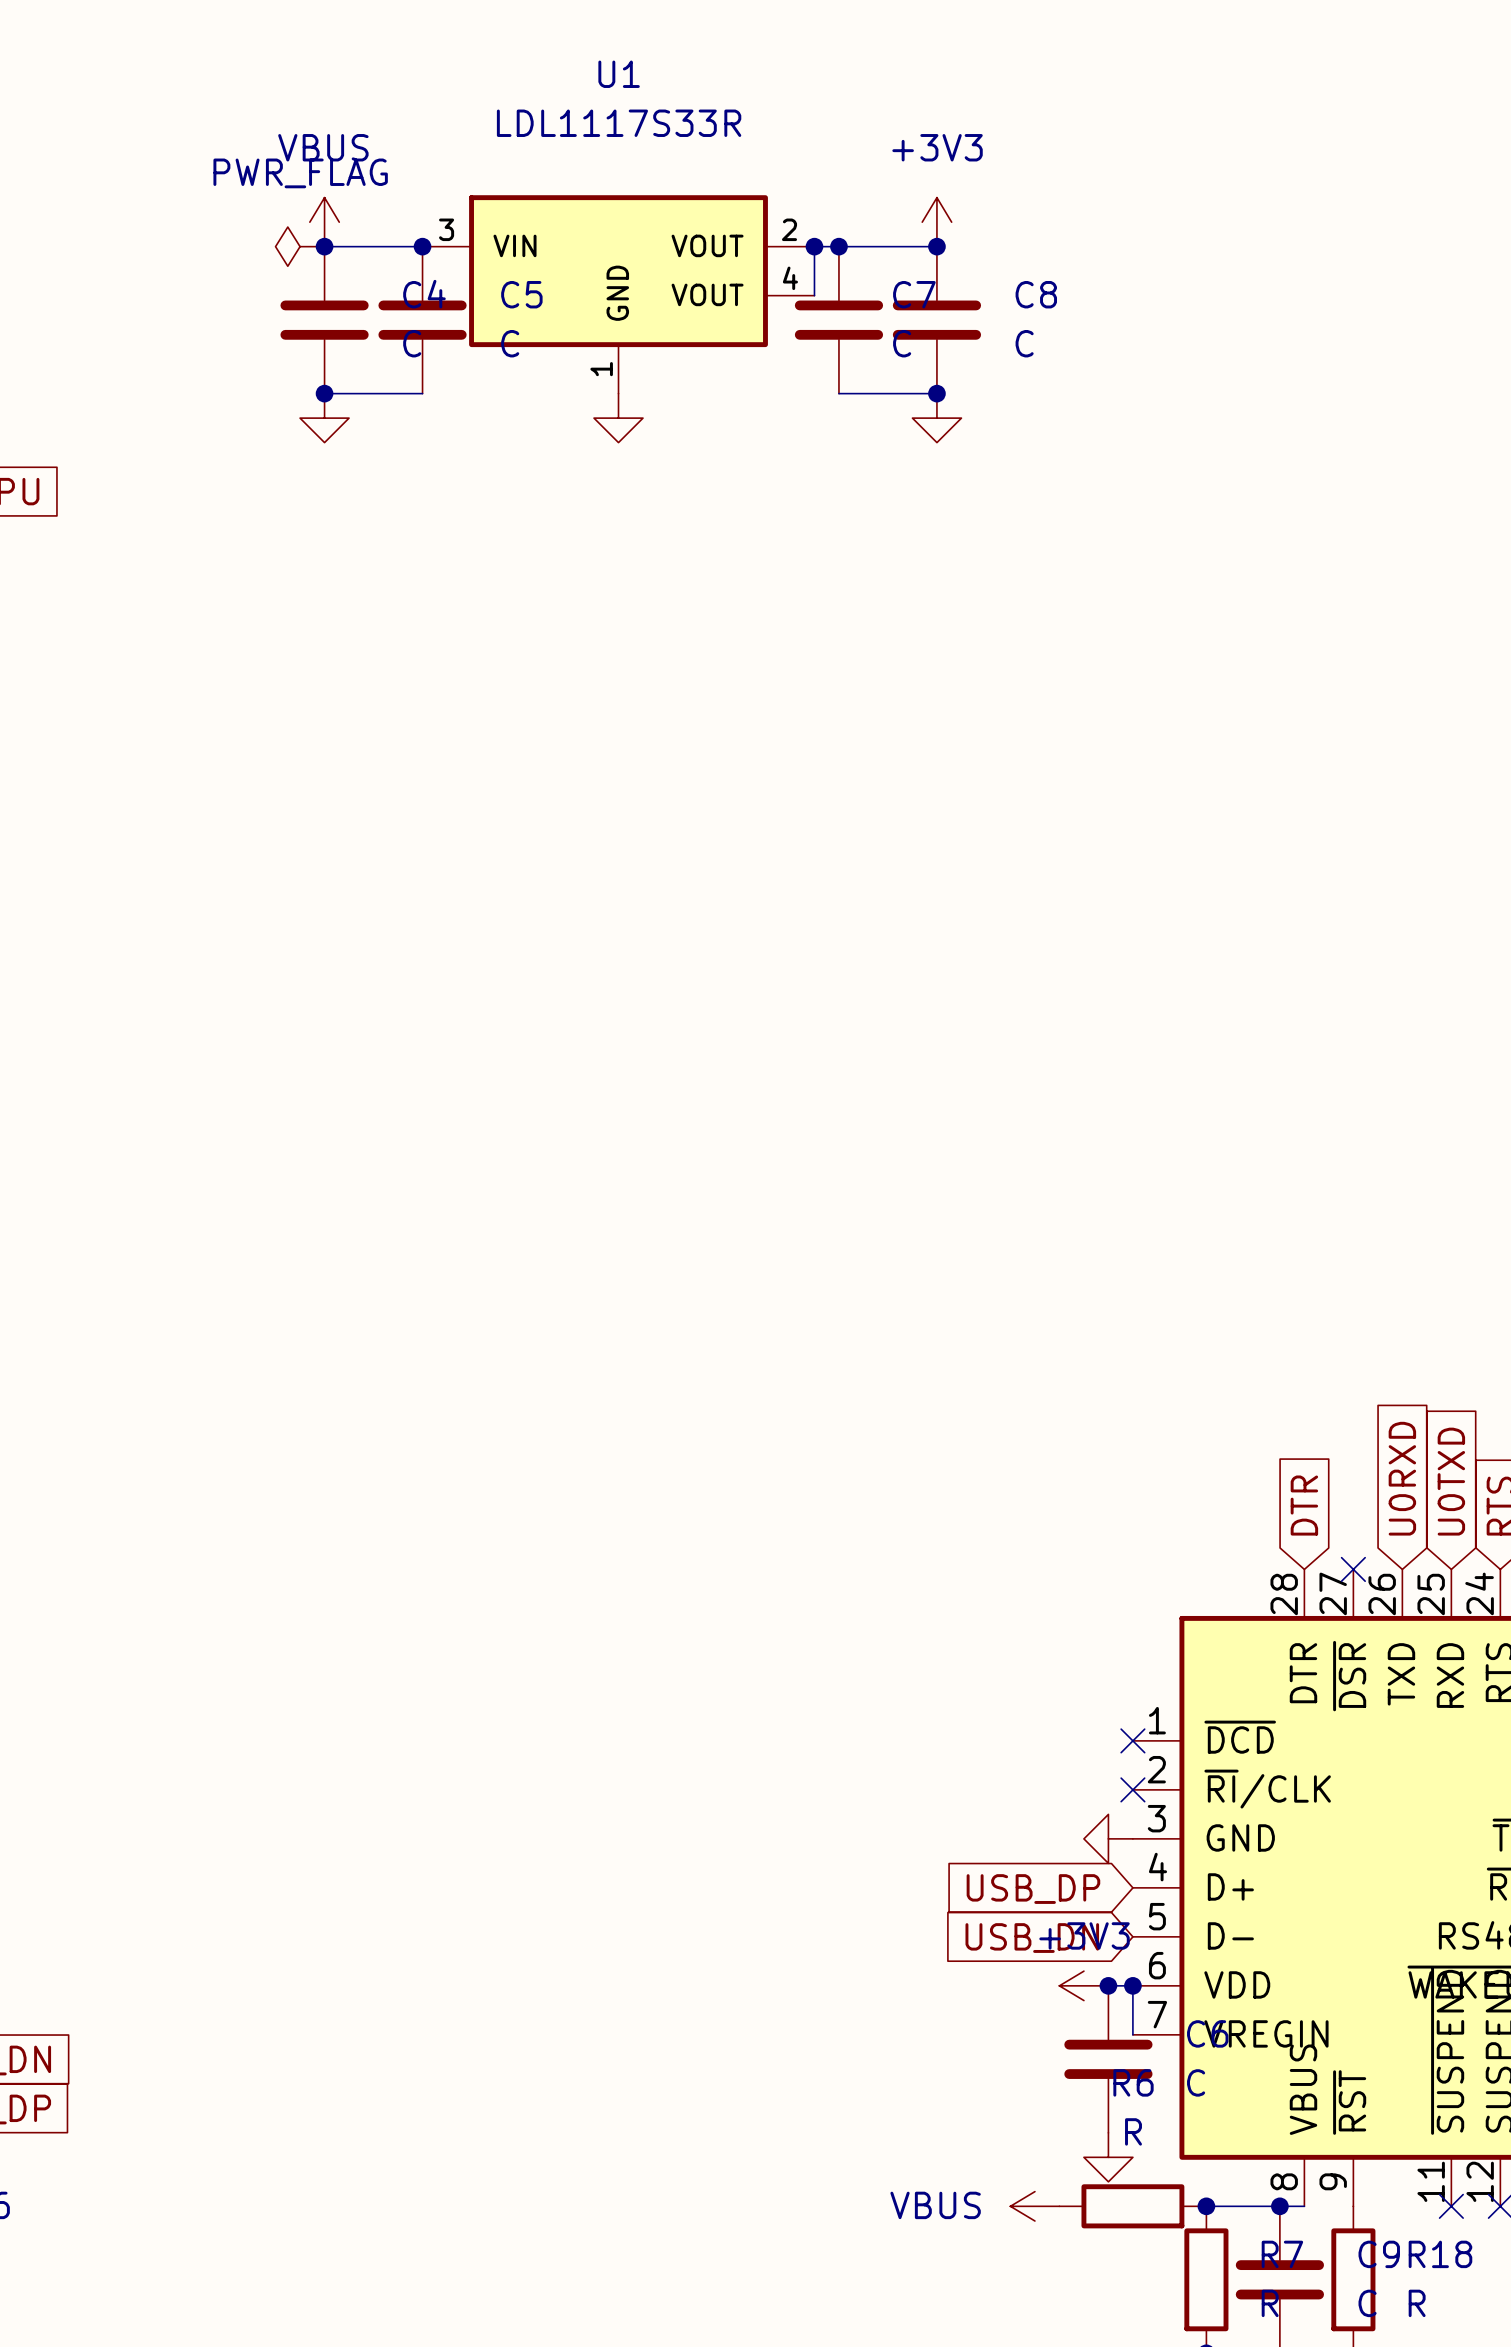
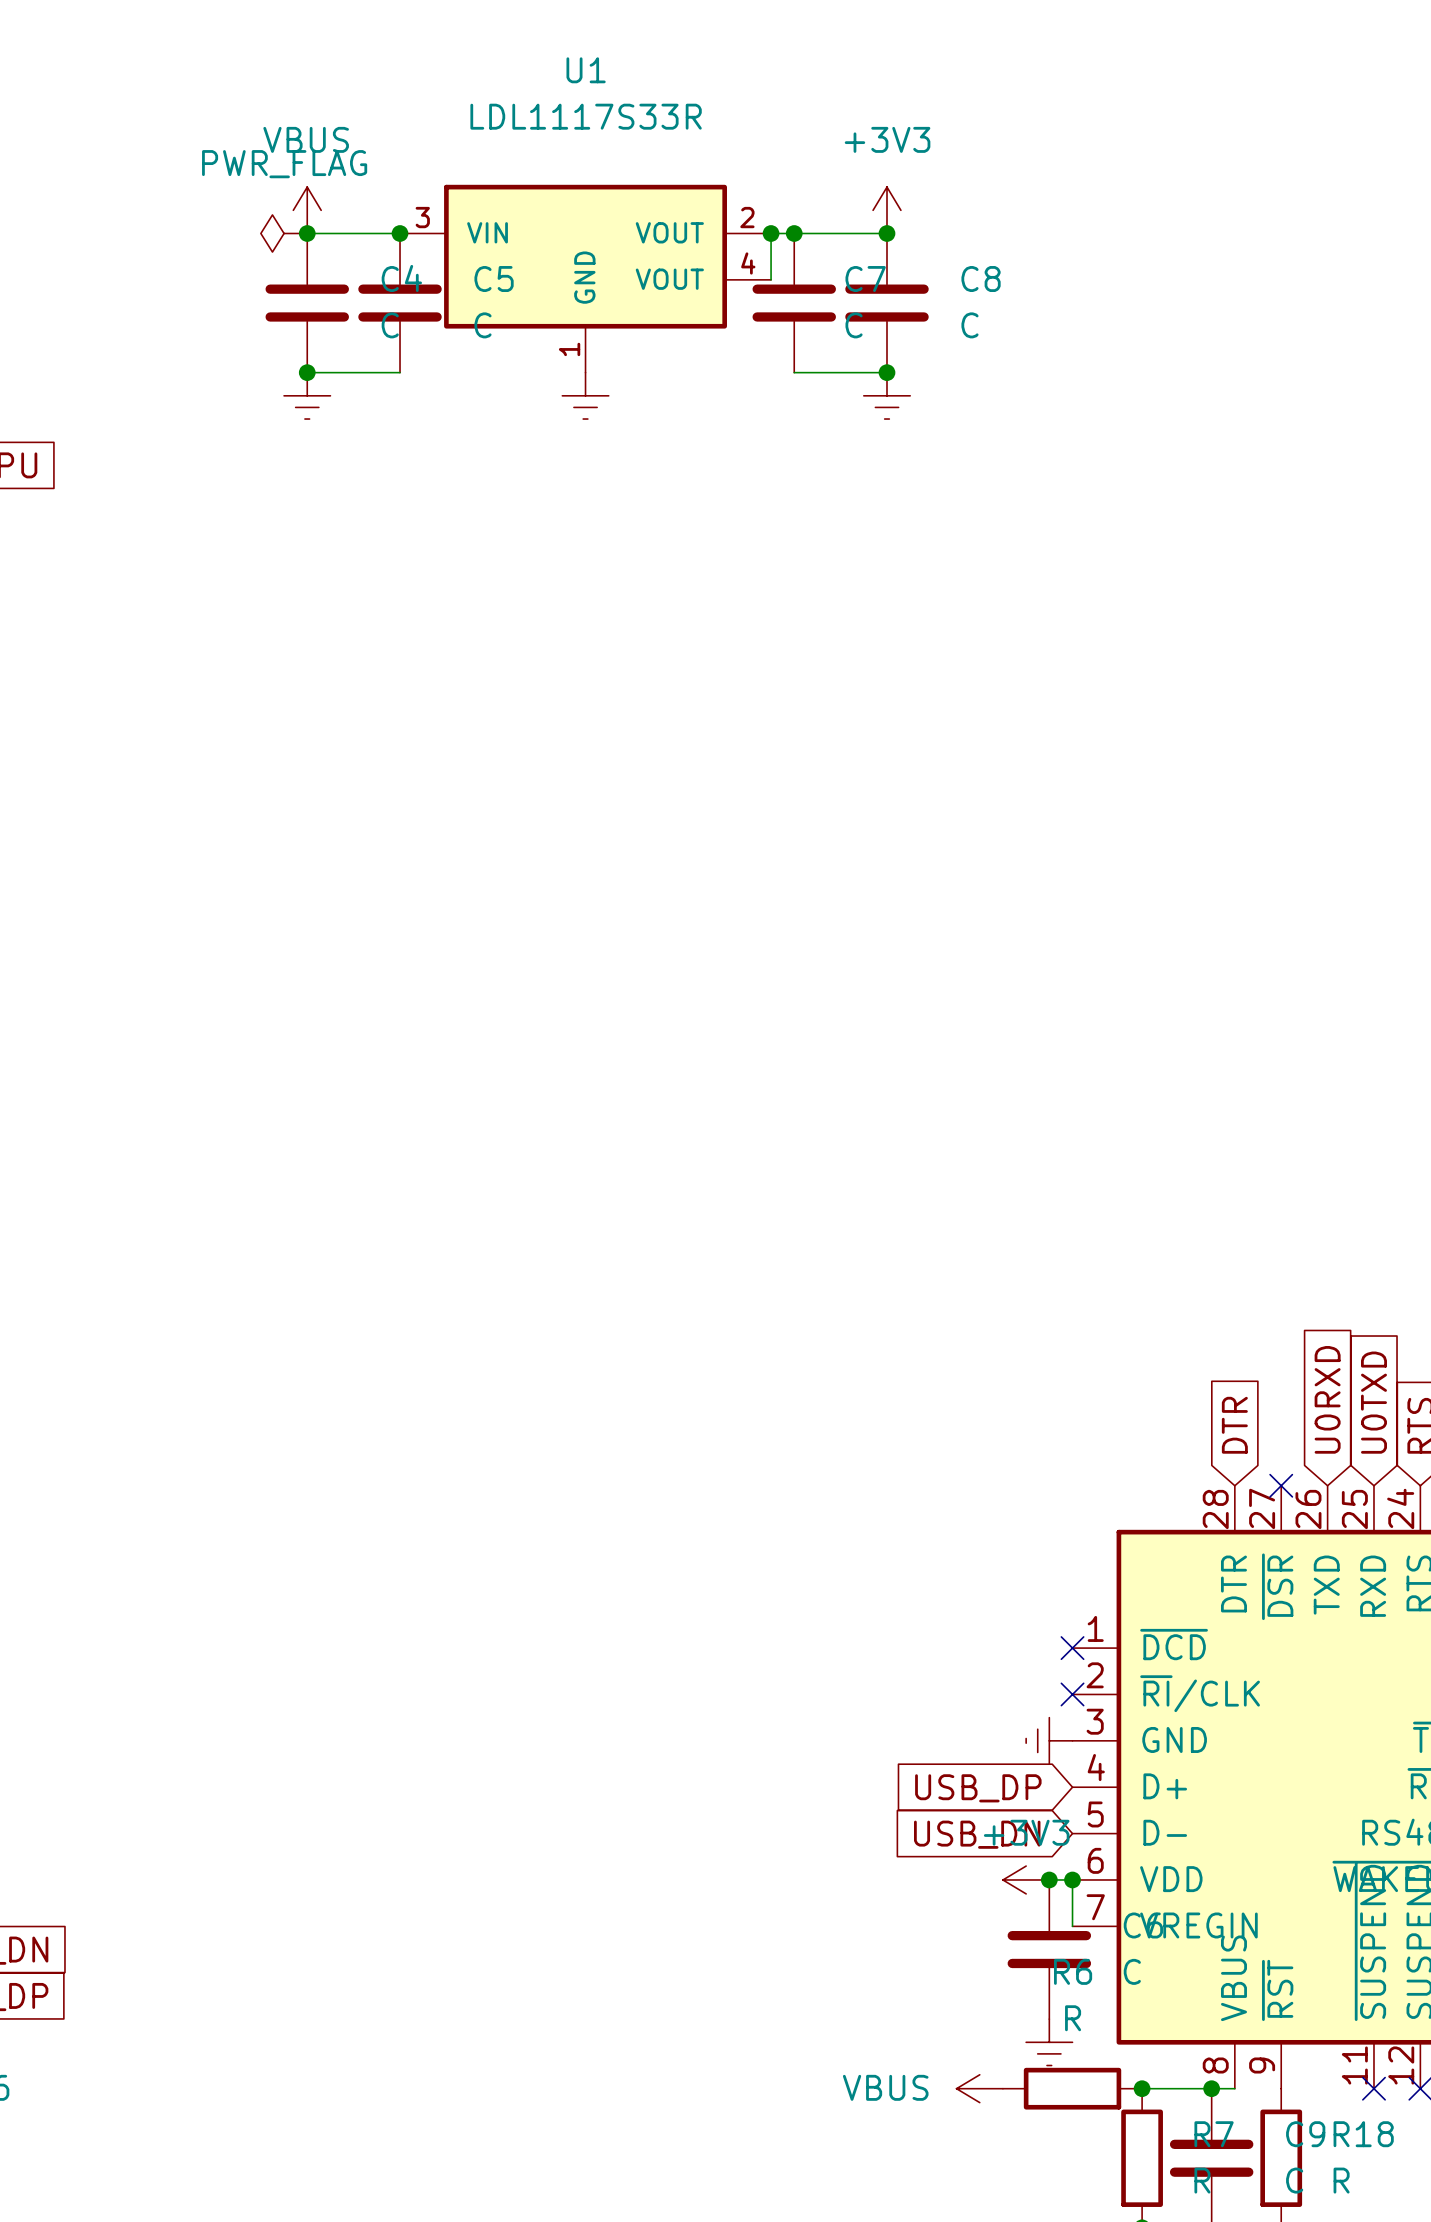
power symbol shape: [300, 393, 350, 443] -> [284, 372, 331, 420]
power symbol shape: [594, 393, 644, 443] -> [562, 372, 609, 420]
power symbol shape: [912, 393, 962, 443] -> [863, 372, 911, 420]
power symbol shape: [1083, 1814, 1133, 1864] -> [1026, 1717, 1073, 1765]
power symbol shape: [1083, 2132, 1133, 2182] -> [1026, 2019, 1073, 2066]

